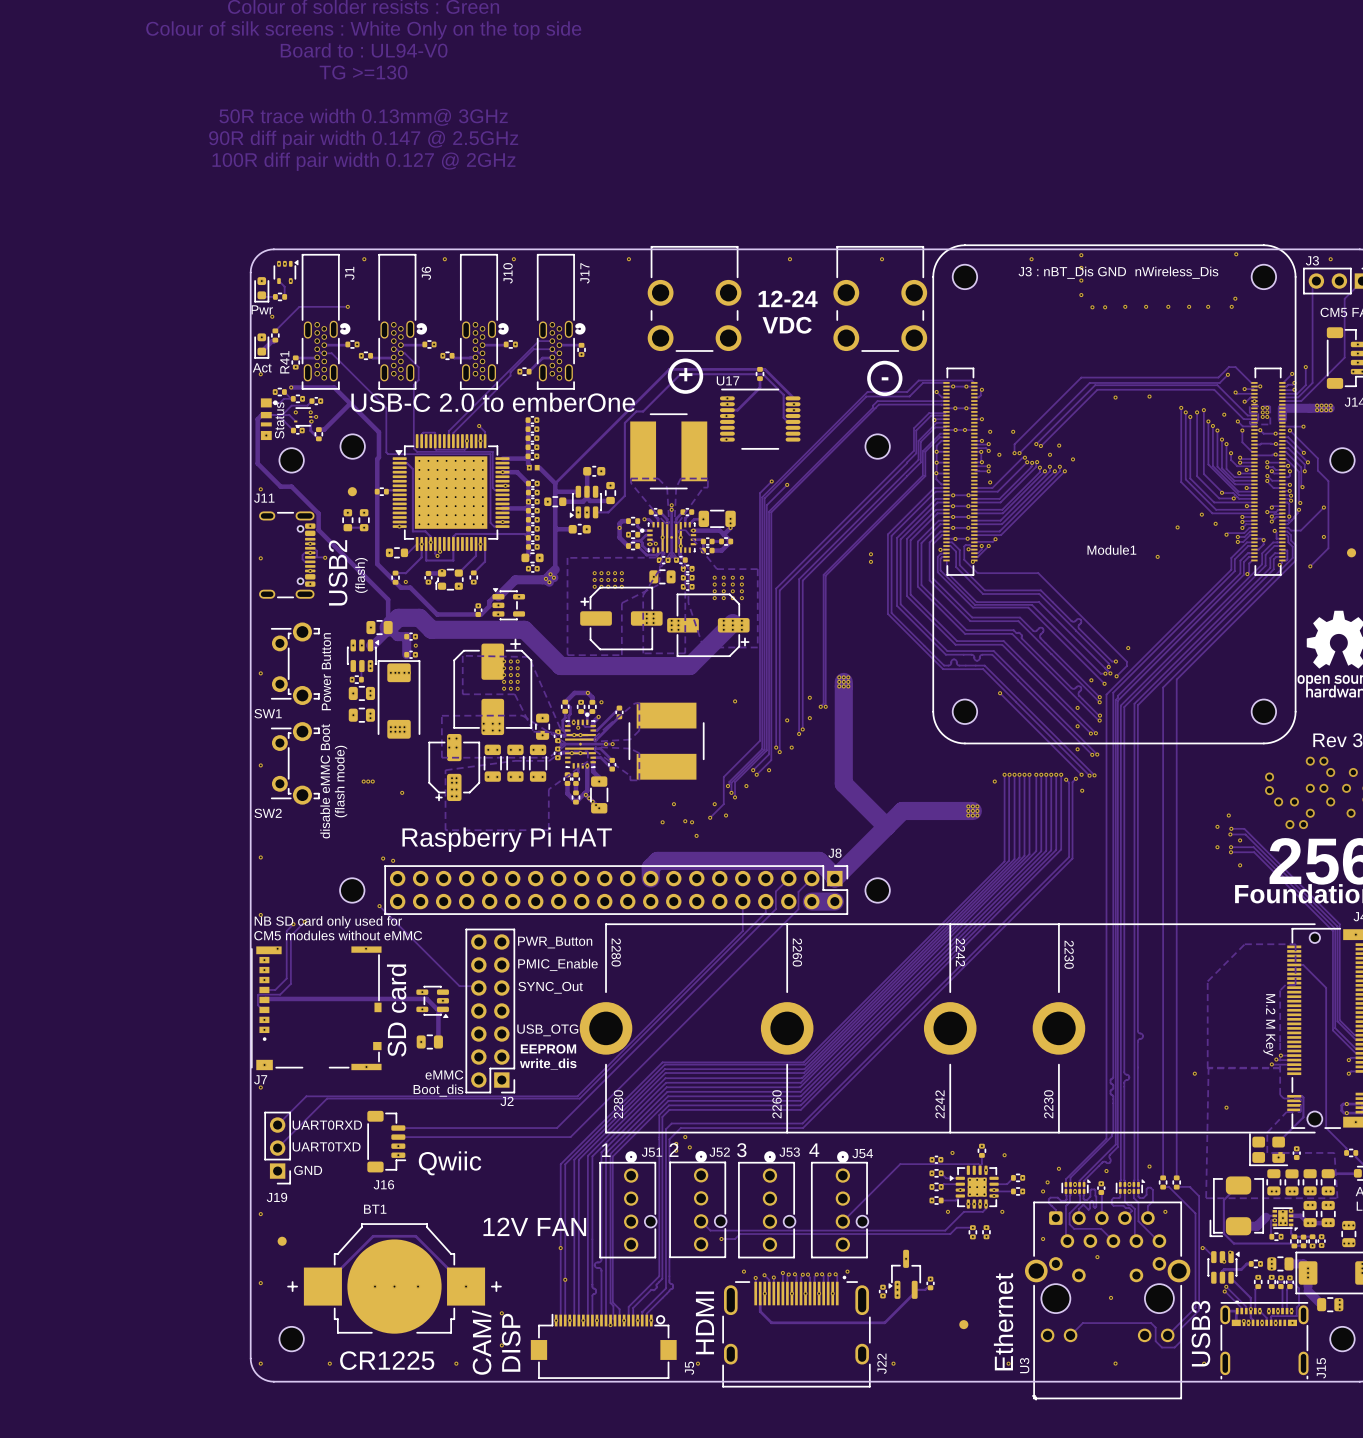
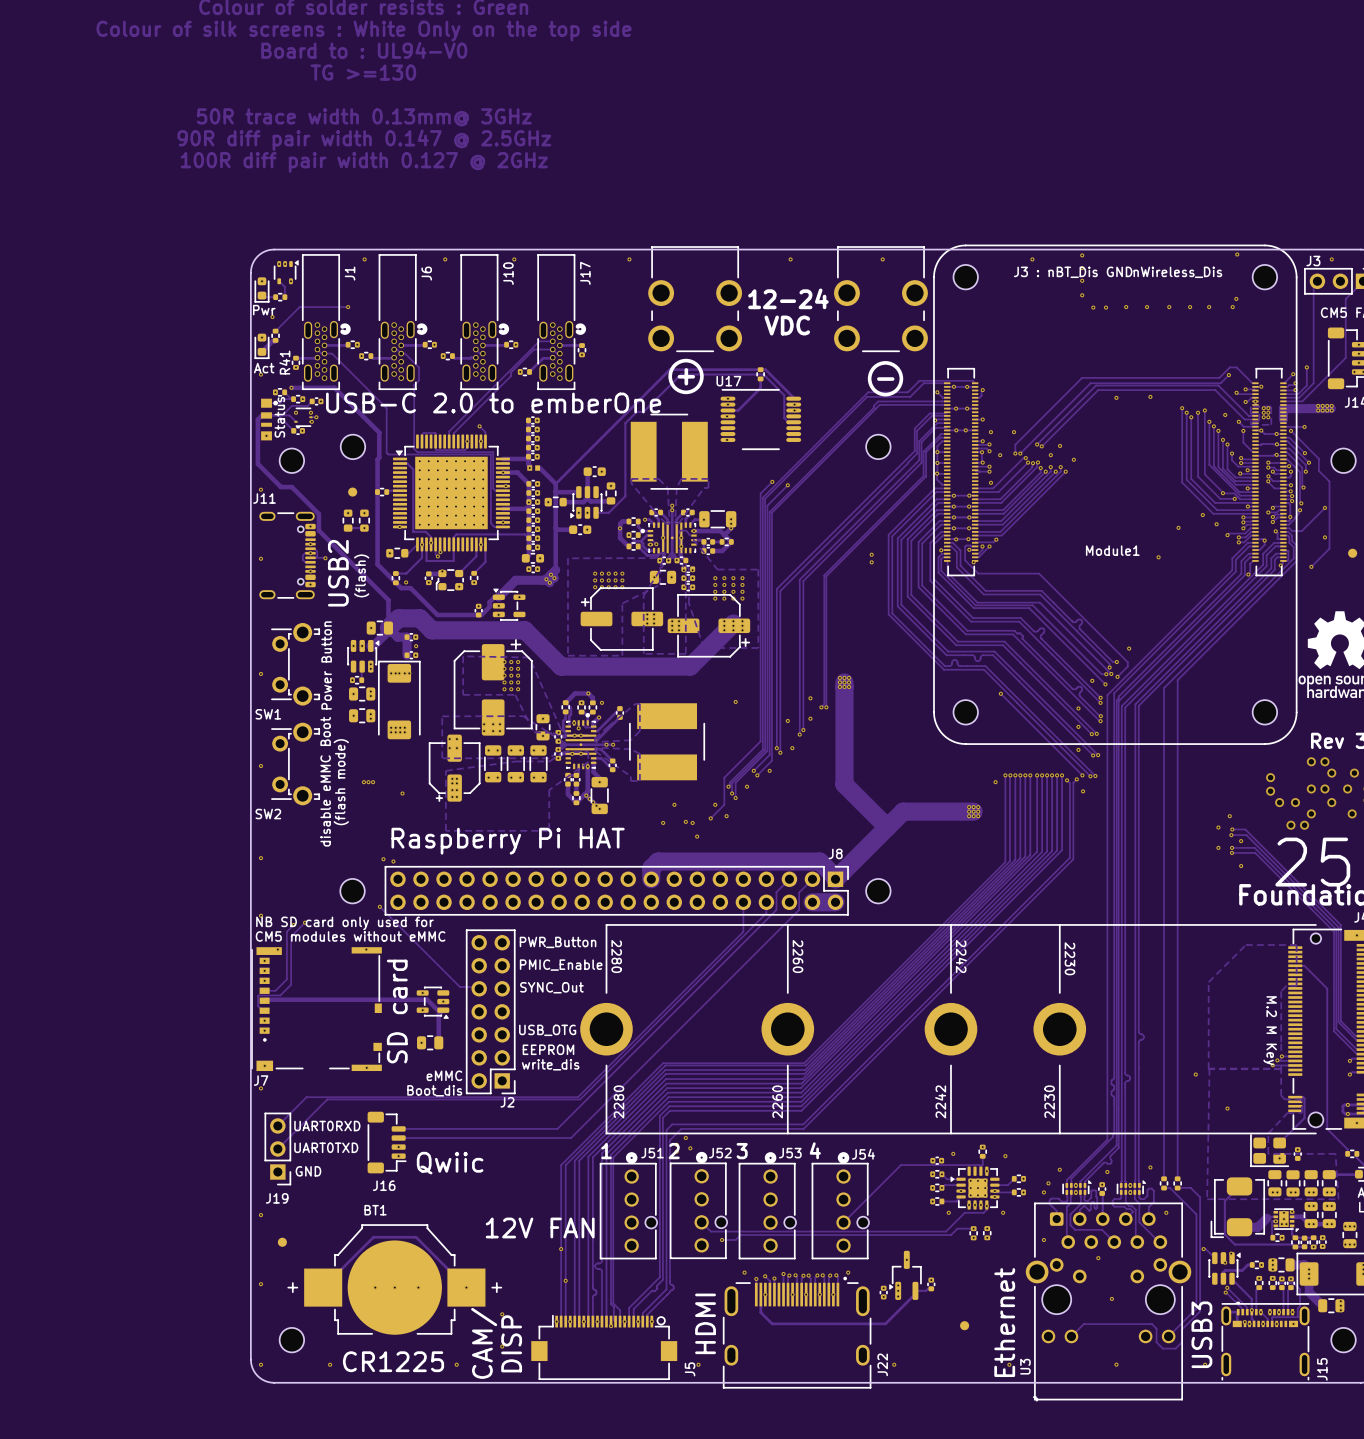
track: (351, 404) (324, 429) (318, 429) -> none
track: (310, 421) (310, 430) (318, 438) -> none
part: (318, 434) -> none

